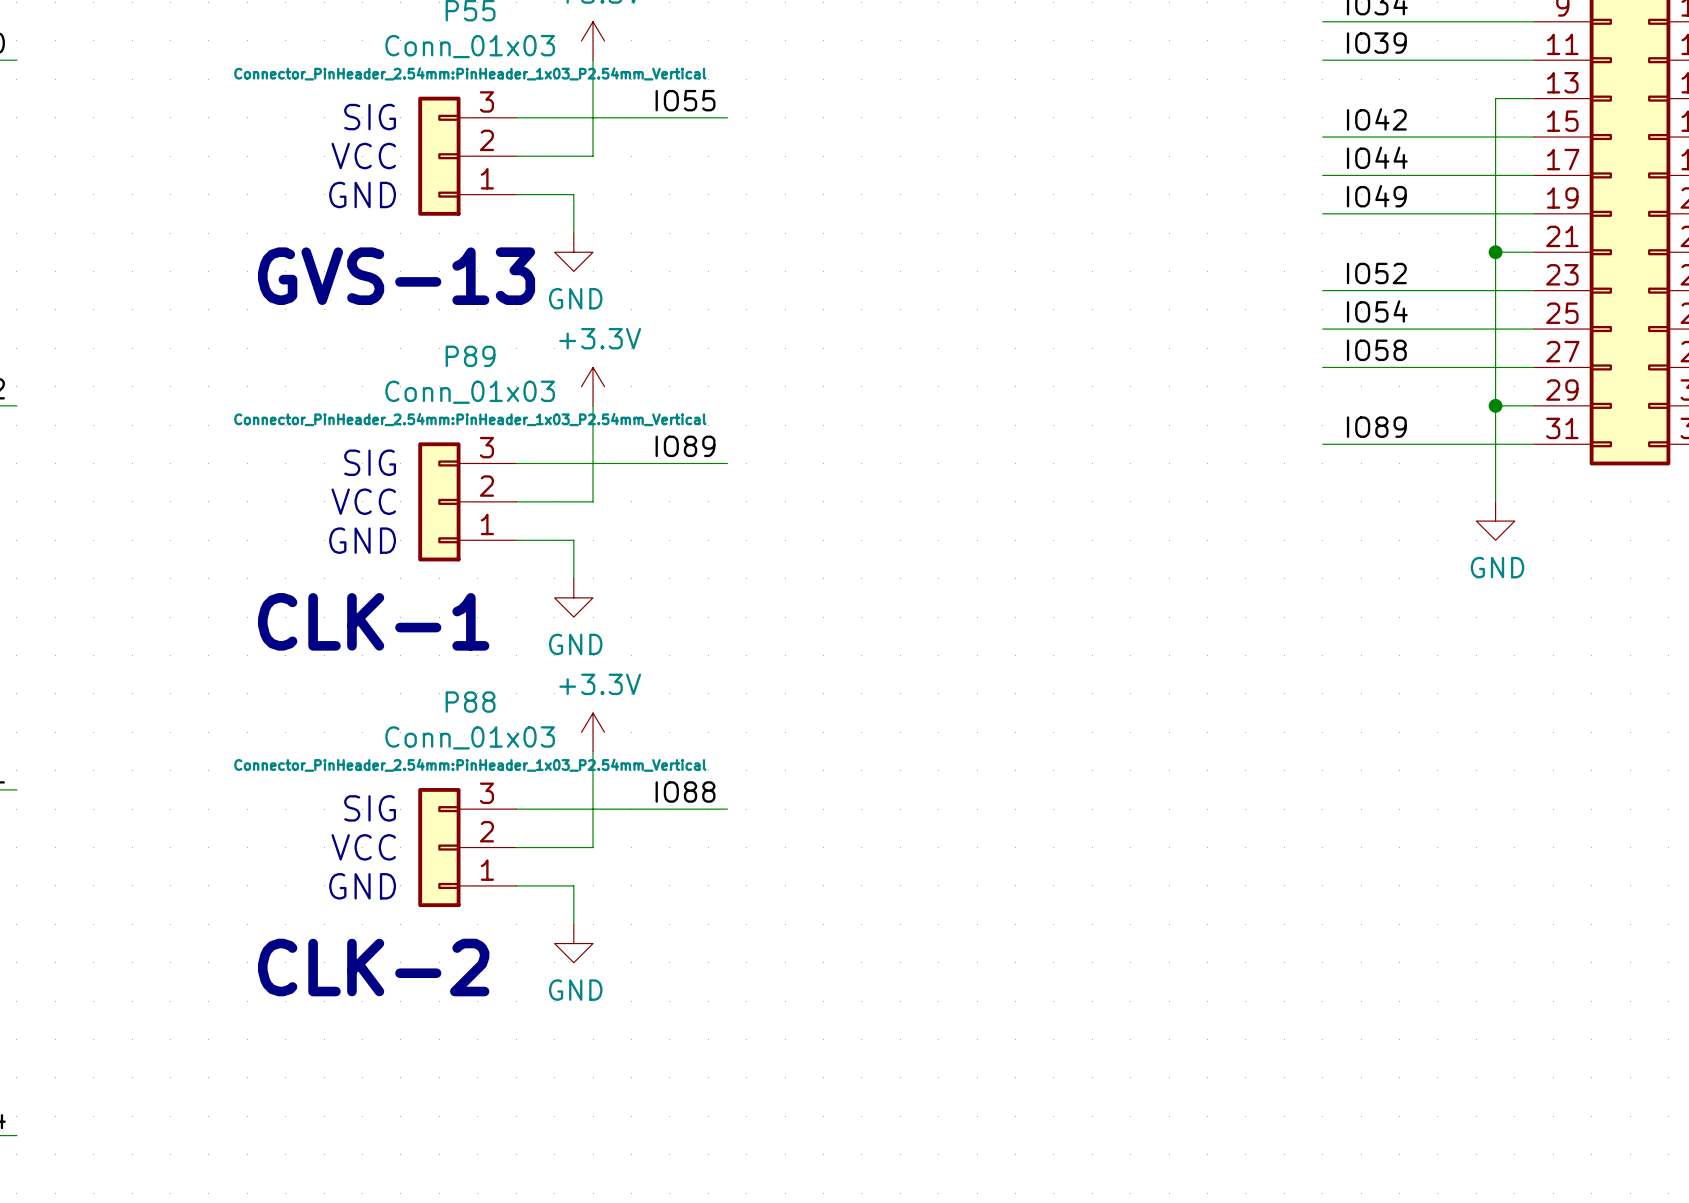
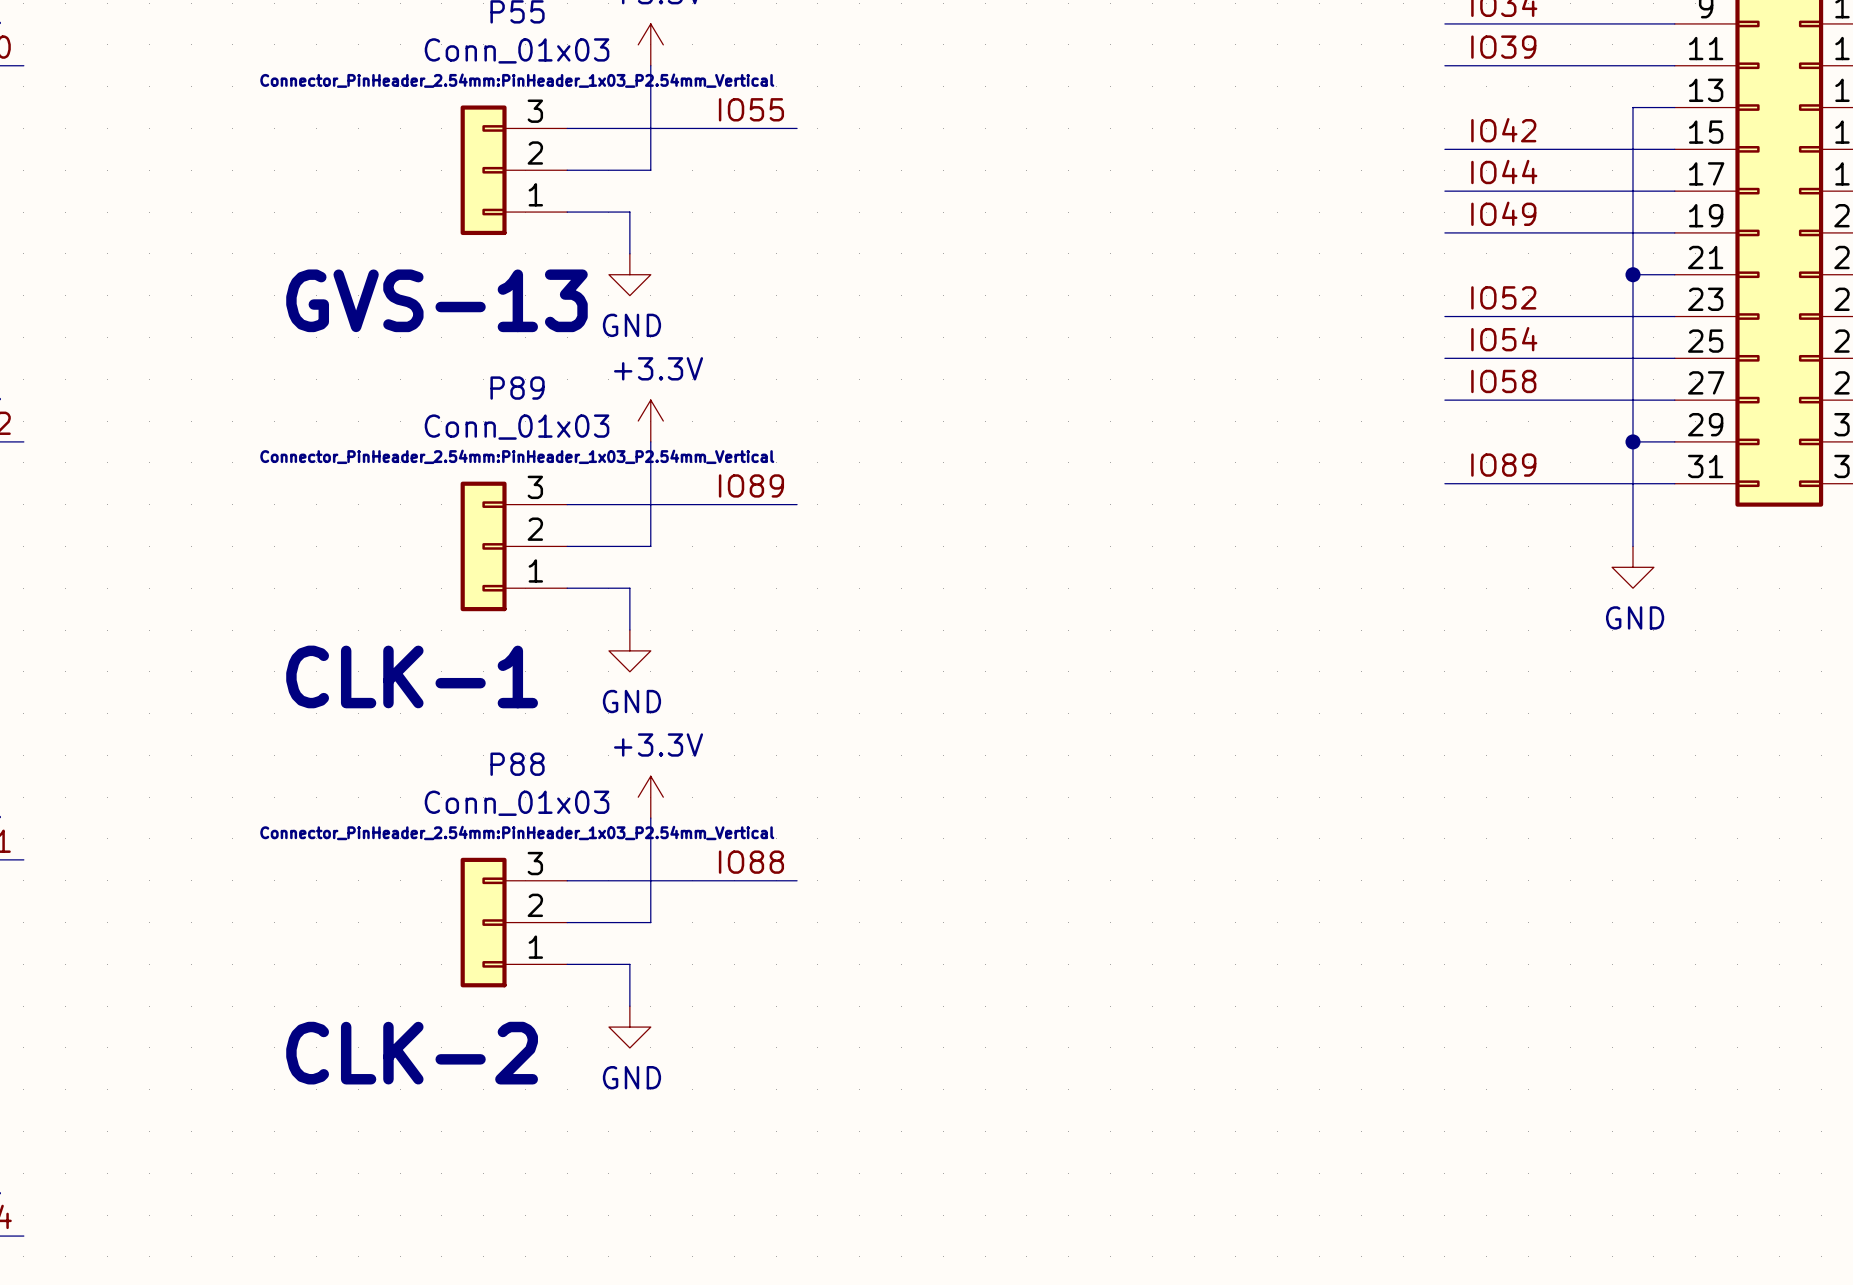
text: SIG (370, 117) -> none
text: VCC (363, 156) -> none
text: GND (362, 194) -> none
text: SIG (370, 462) -> none
text: VCC (363, 501) -> none
text: GND (362, 540) -> none
text: SIG (370, 808) -> none
text: VCC (363, 847) -> none
text: GND (362, 886) -> none

